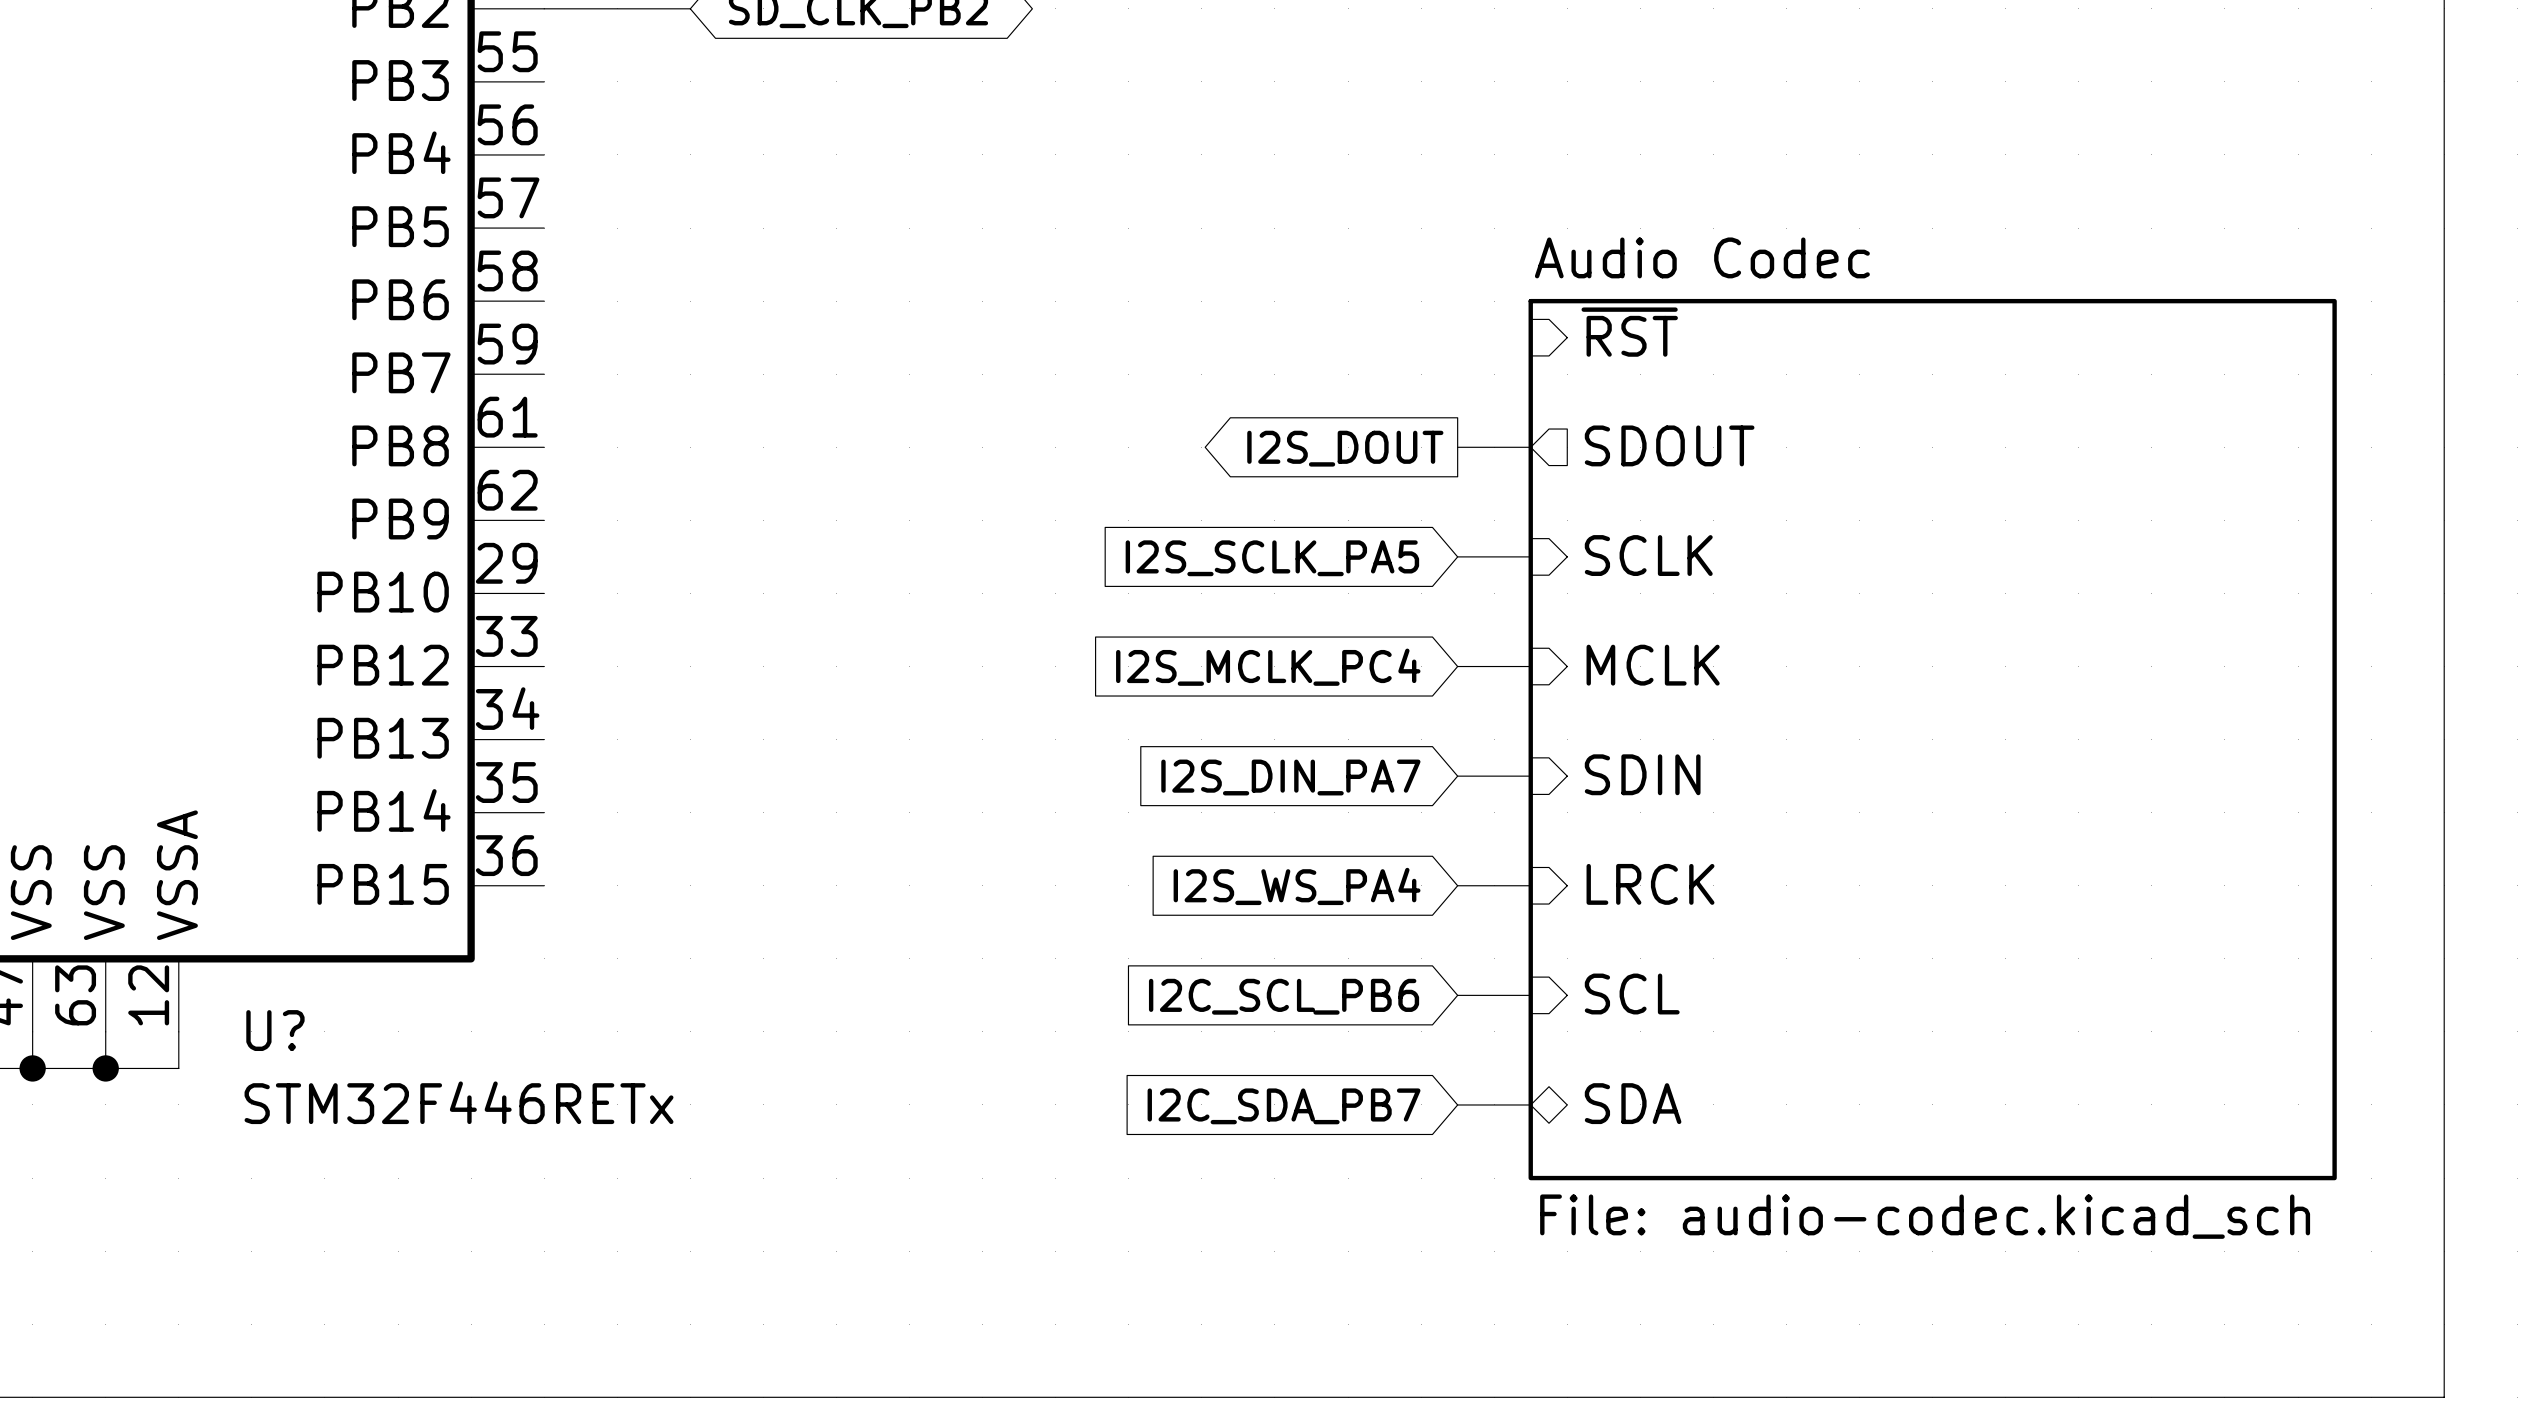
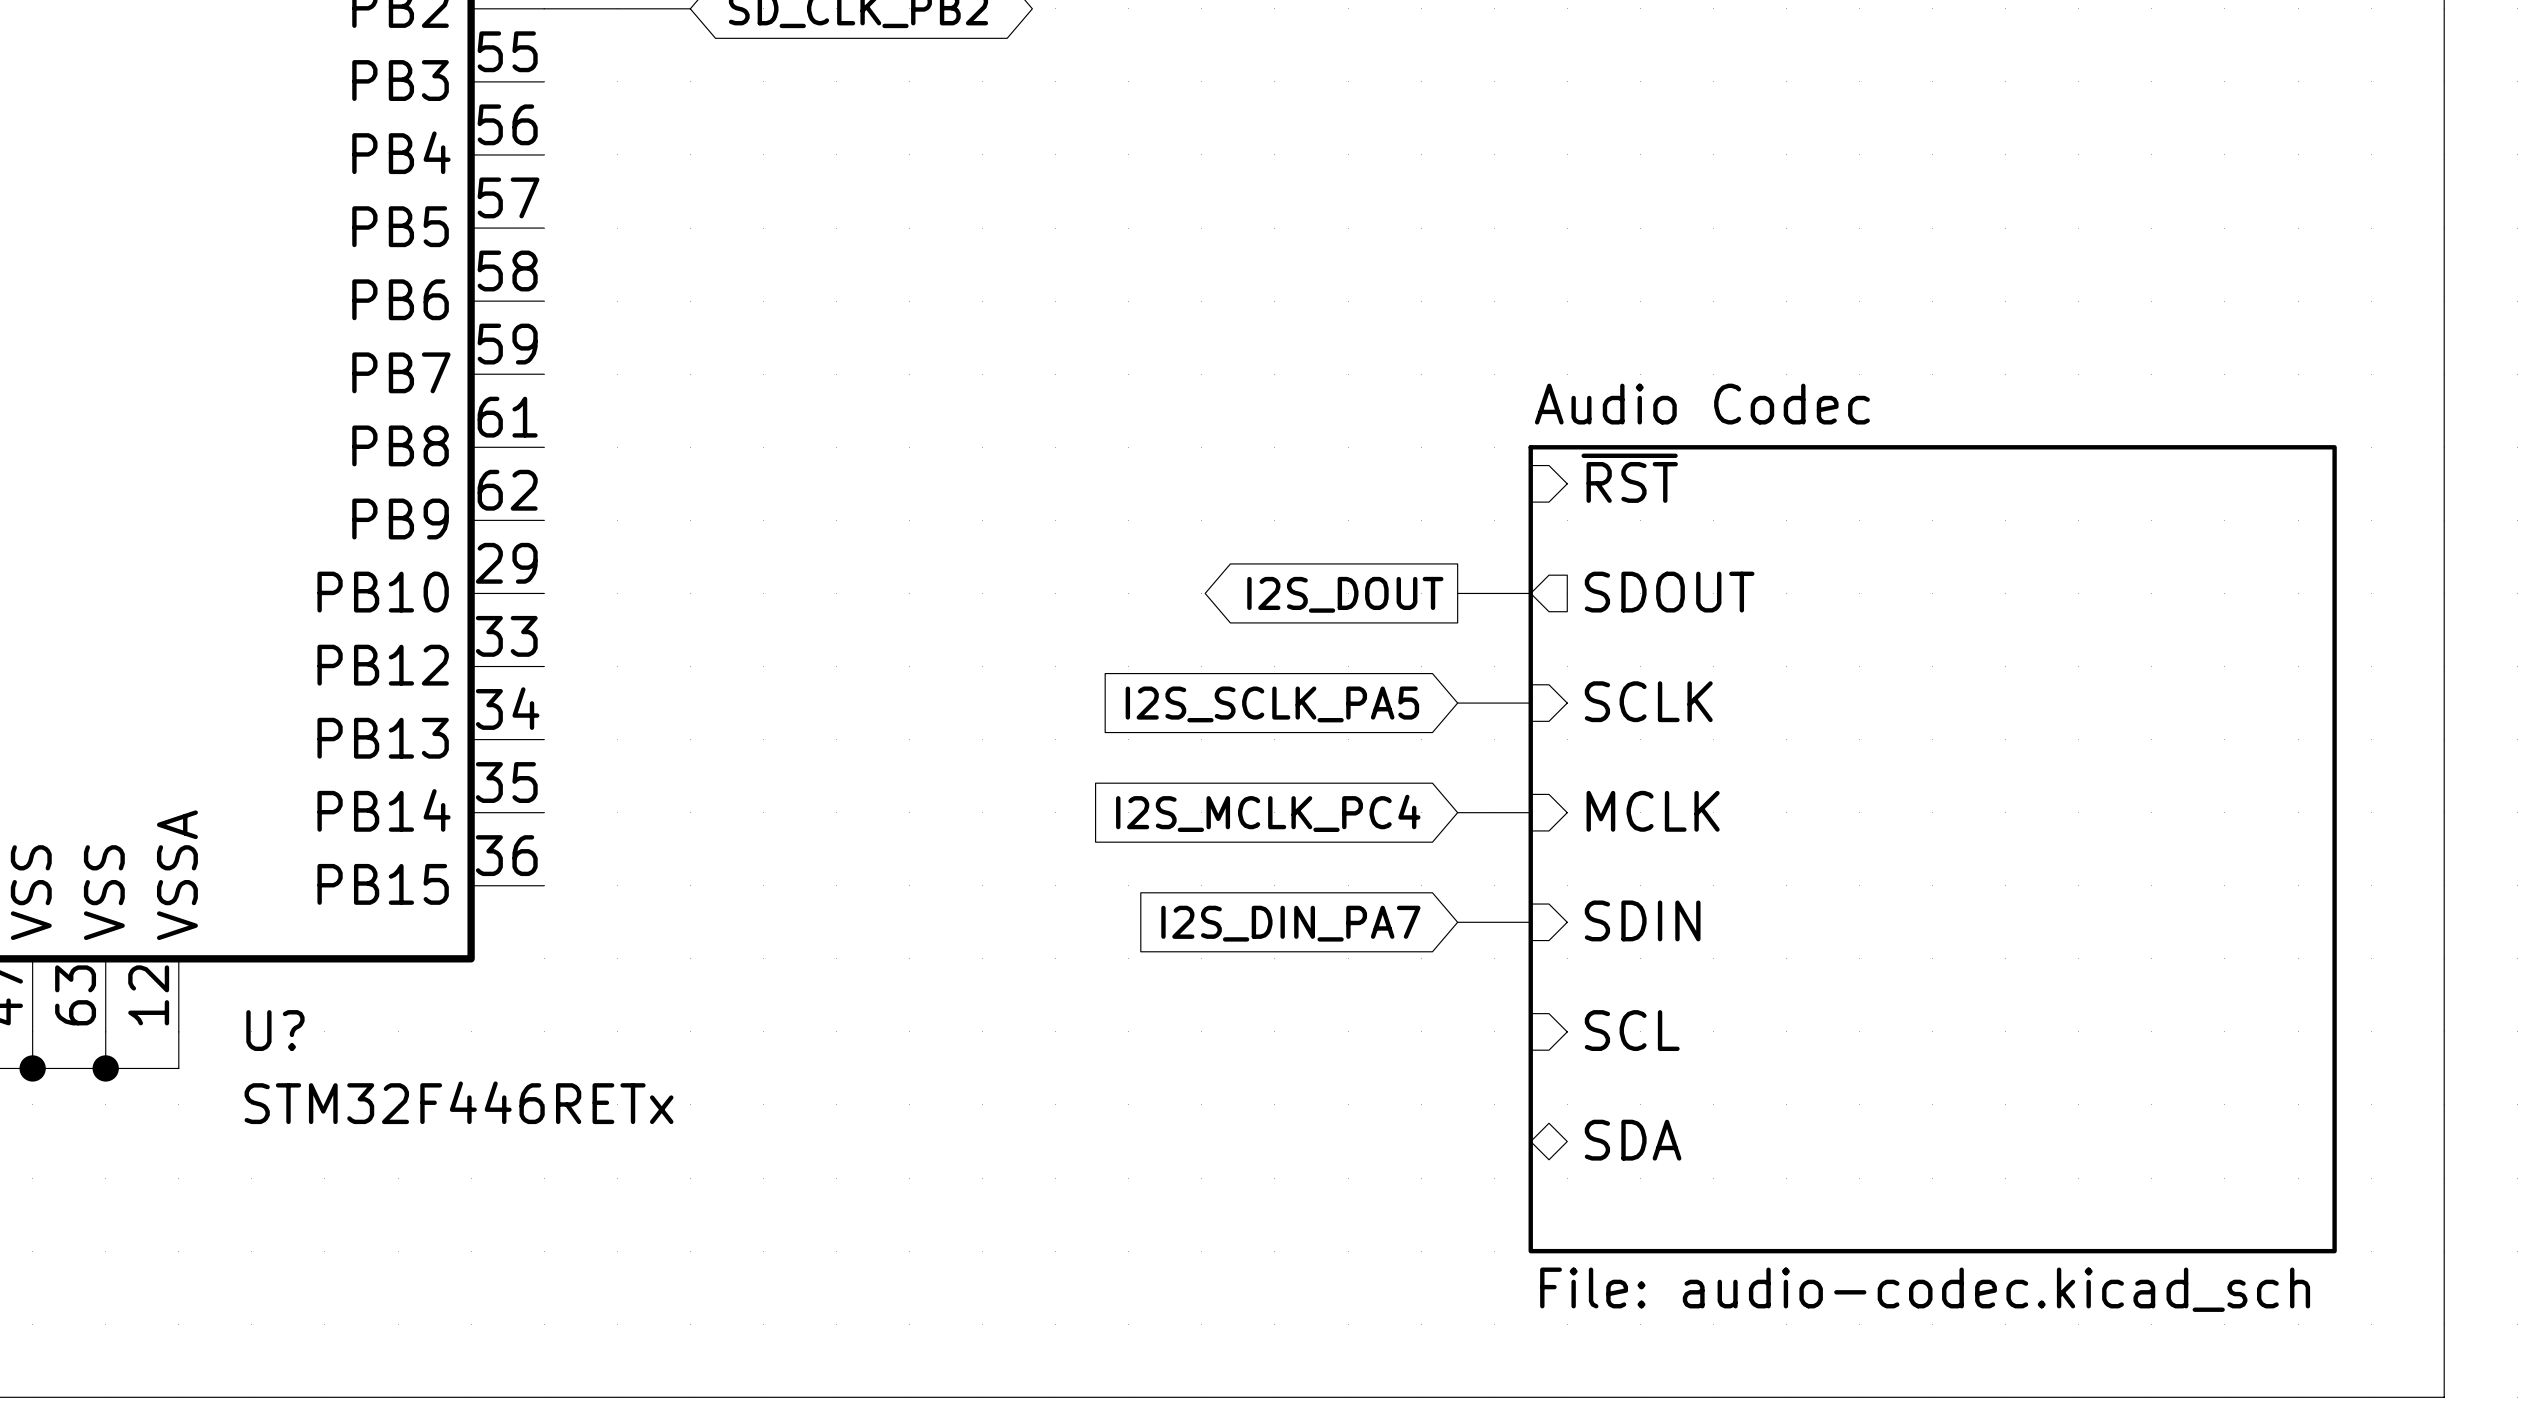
sheet pin position: ~{RST} (1629, 332) -> ~{RST} (1629, 478)
sheet pin position: SDOUT (1669, 445) -> SDOUT (1669, 592)
wire: (1457, 447) (1530, 447) -> none
global label position: I2S_DOUT (1345, 448) -> I2S_DOUT (1345, 594)
sheet pin position: SCLK (1648, 555) -> SCLK (1648, 701)
wire: (1457, 556) (1530, 556) -> (1457, 593) (1530, 593)
global label position: I2S_SCLK_PA5 (1272, 558) -> I2S_SCLK_PA5 (1272, 704)
sheet pin position: MCLK (1653, 665) -> MCLK (1653, 811)
wire: (1457, 666) (1530, 666) -> (1457, 703) (1530, 703)
global label position: I2S_MCLK_PC4 (1268, 667) -> I2S_MCLK_PC4 (1268, 813)
sheet Audio Codec: File: audio-codec.kicad_sch (1932, 739) -> none
sheet pin position: SDIN (1642, 774) -> SDIN (1642, 920)
wire: (1457, 776) (1530, 776) -> (1457, 812) (1530, 812)
global label position: I2S_DIN_PA7 (1290, 777) -> I2S_DIN_PA7 (1290, 923)
sheet Audio Codec: none -> File: audio-codec.kicad_sch (1932, 849)
sheet pin: LRCK (1650, 884) -> none
wire: (1457, 885) (1530, 885) -> (1457, 922) (1530, 922)
global label: I2S_WS_PA4 (1297, 886) -> none
sheet pin position: SCL (1632, 994) -> SCL (1632, 1030)
wire: (1457, 995) (1530, 995) -> none
global label: I2C_SCL_PB6 (1284, 996) -> none
sheet pin position: SDA (1633, 1103) -> SDA (1633, 1140)
wire: (1457, 1104) (1530, 1104) -> none
global label: I2C_SDA_PB7 (1284, 1106) -> none

